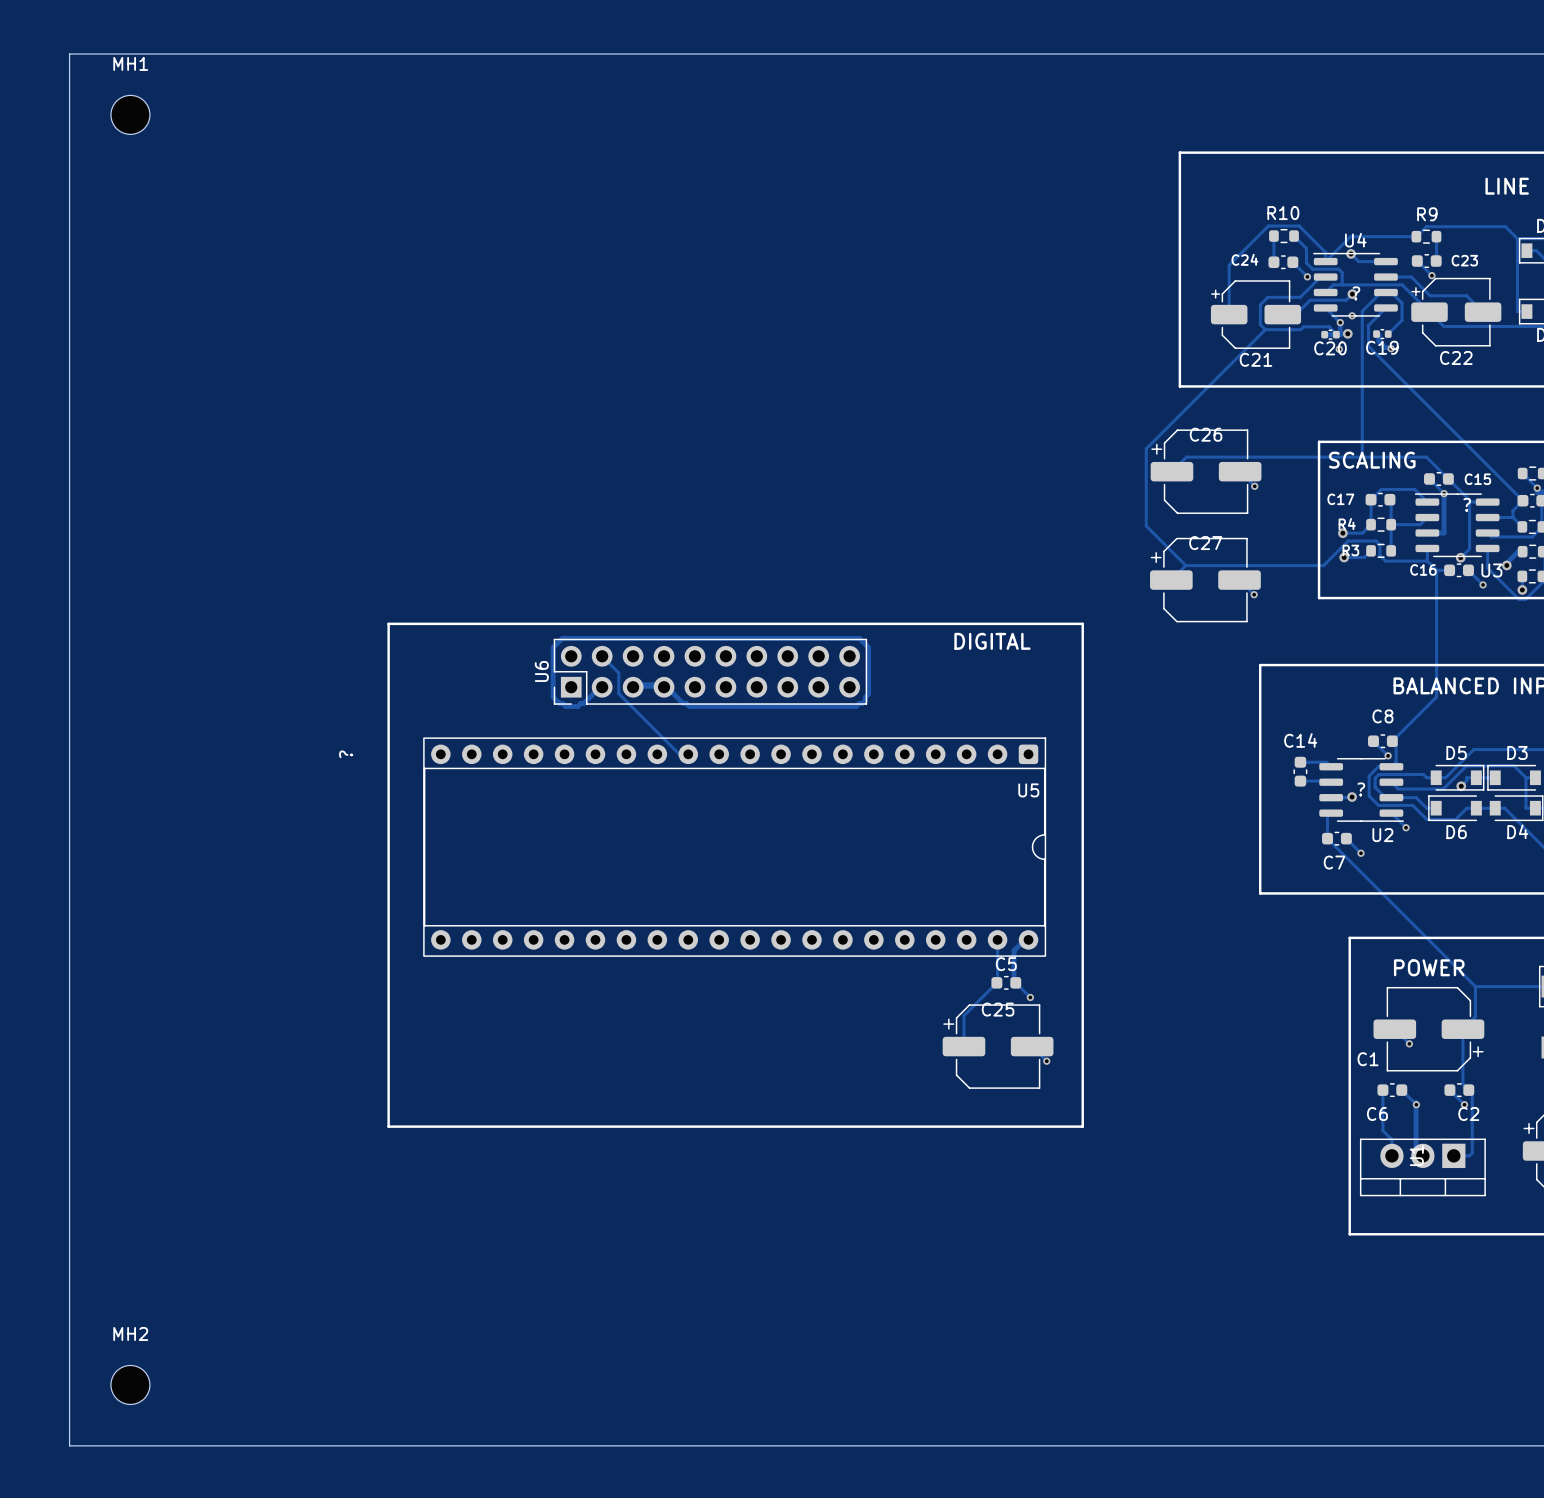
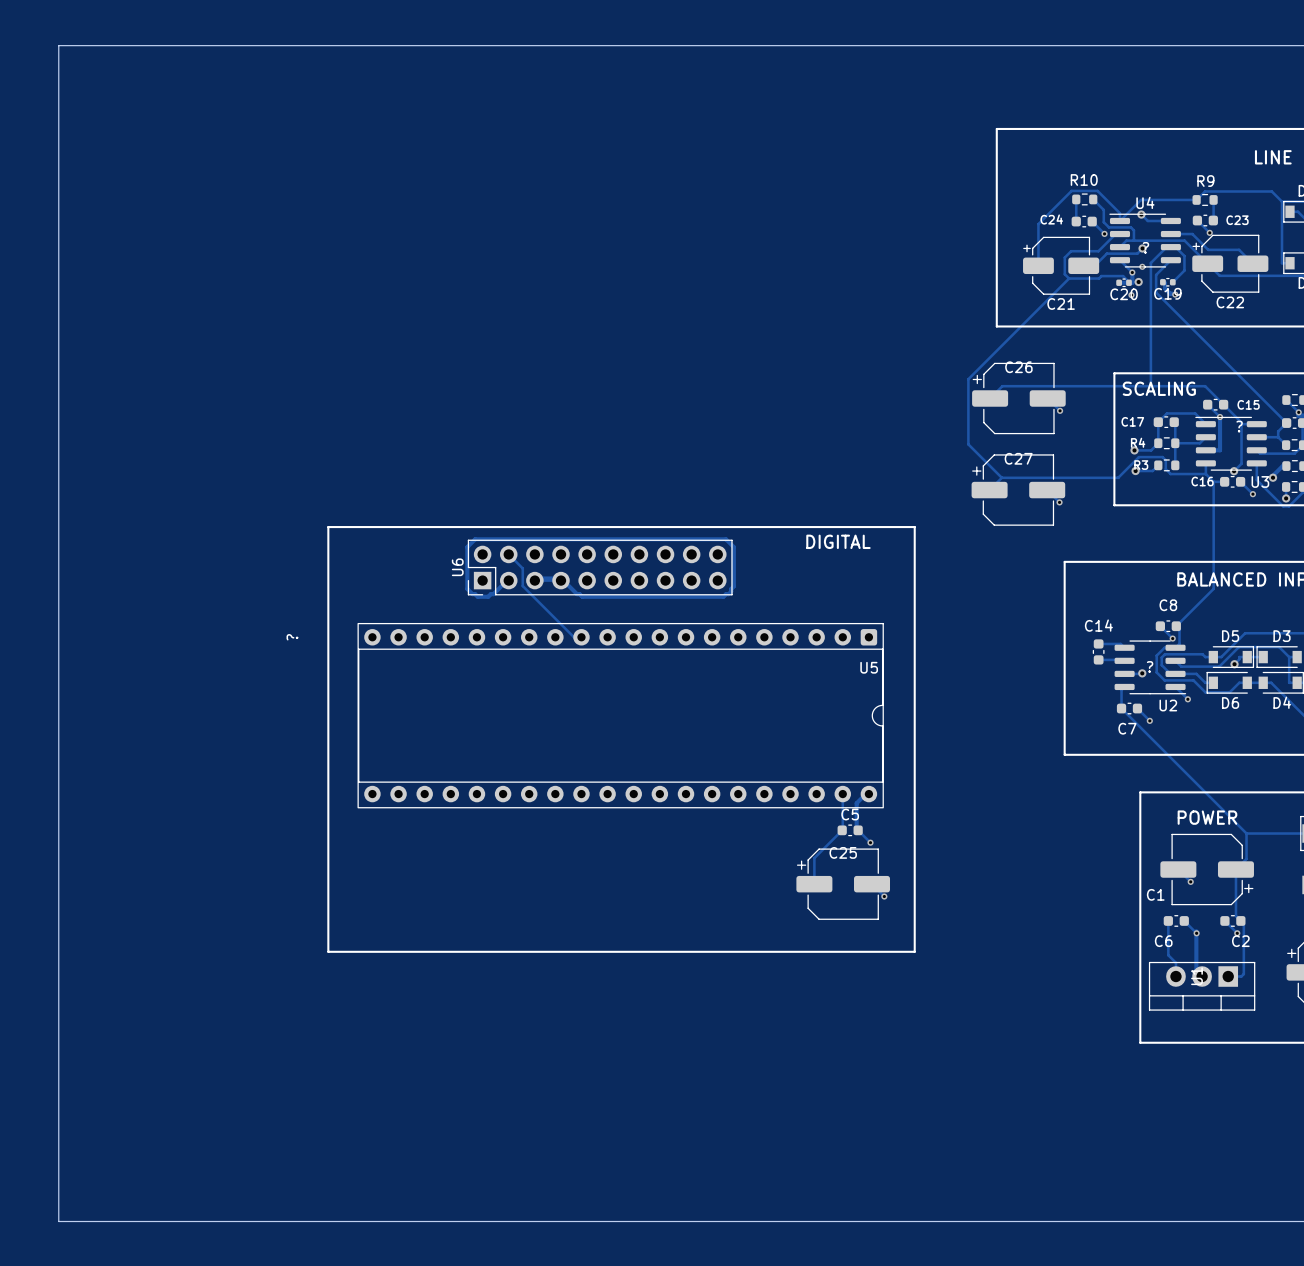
MH1: (130, 114) -> none
MH2: (130, 1384) -> none

